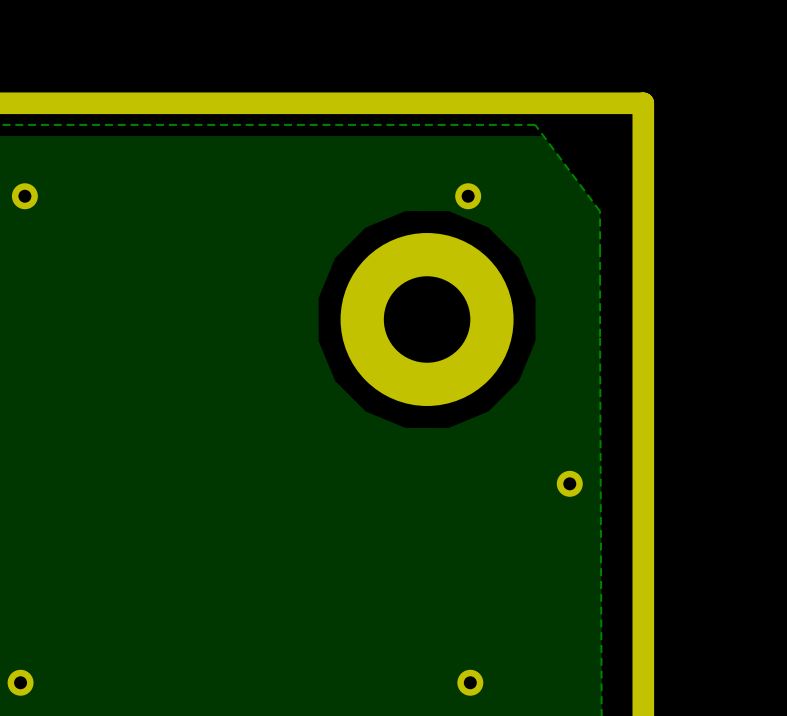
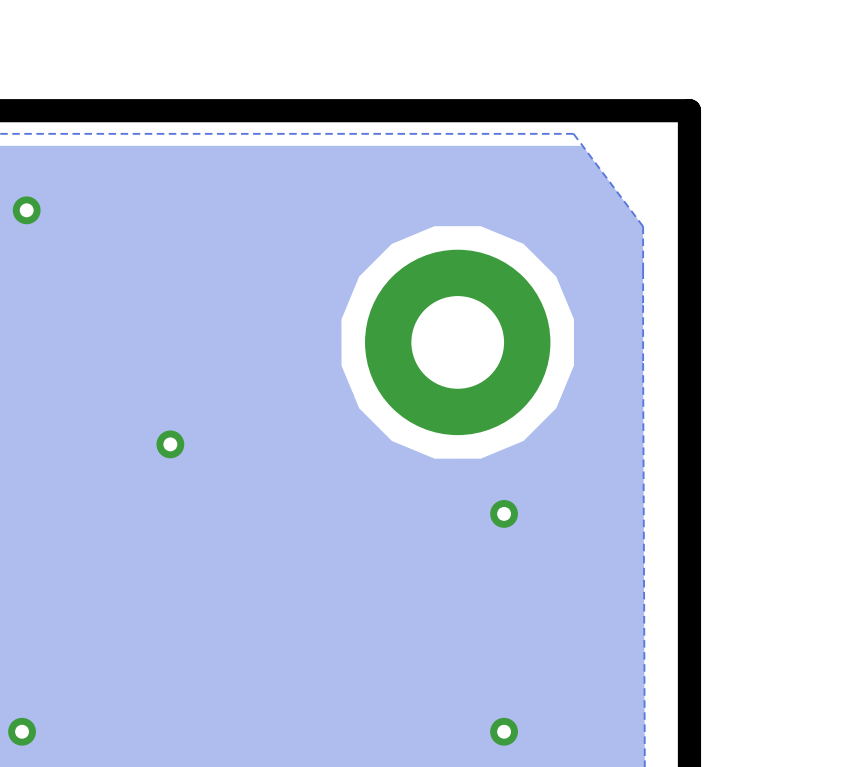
part: (468, 196) -> none
part: none -> (170, 444)
part position: (569, 483) -> (504, 513)

